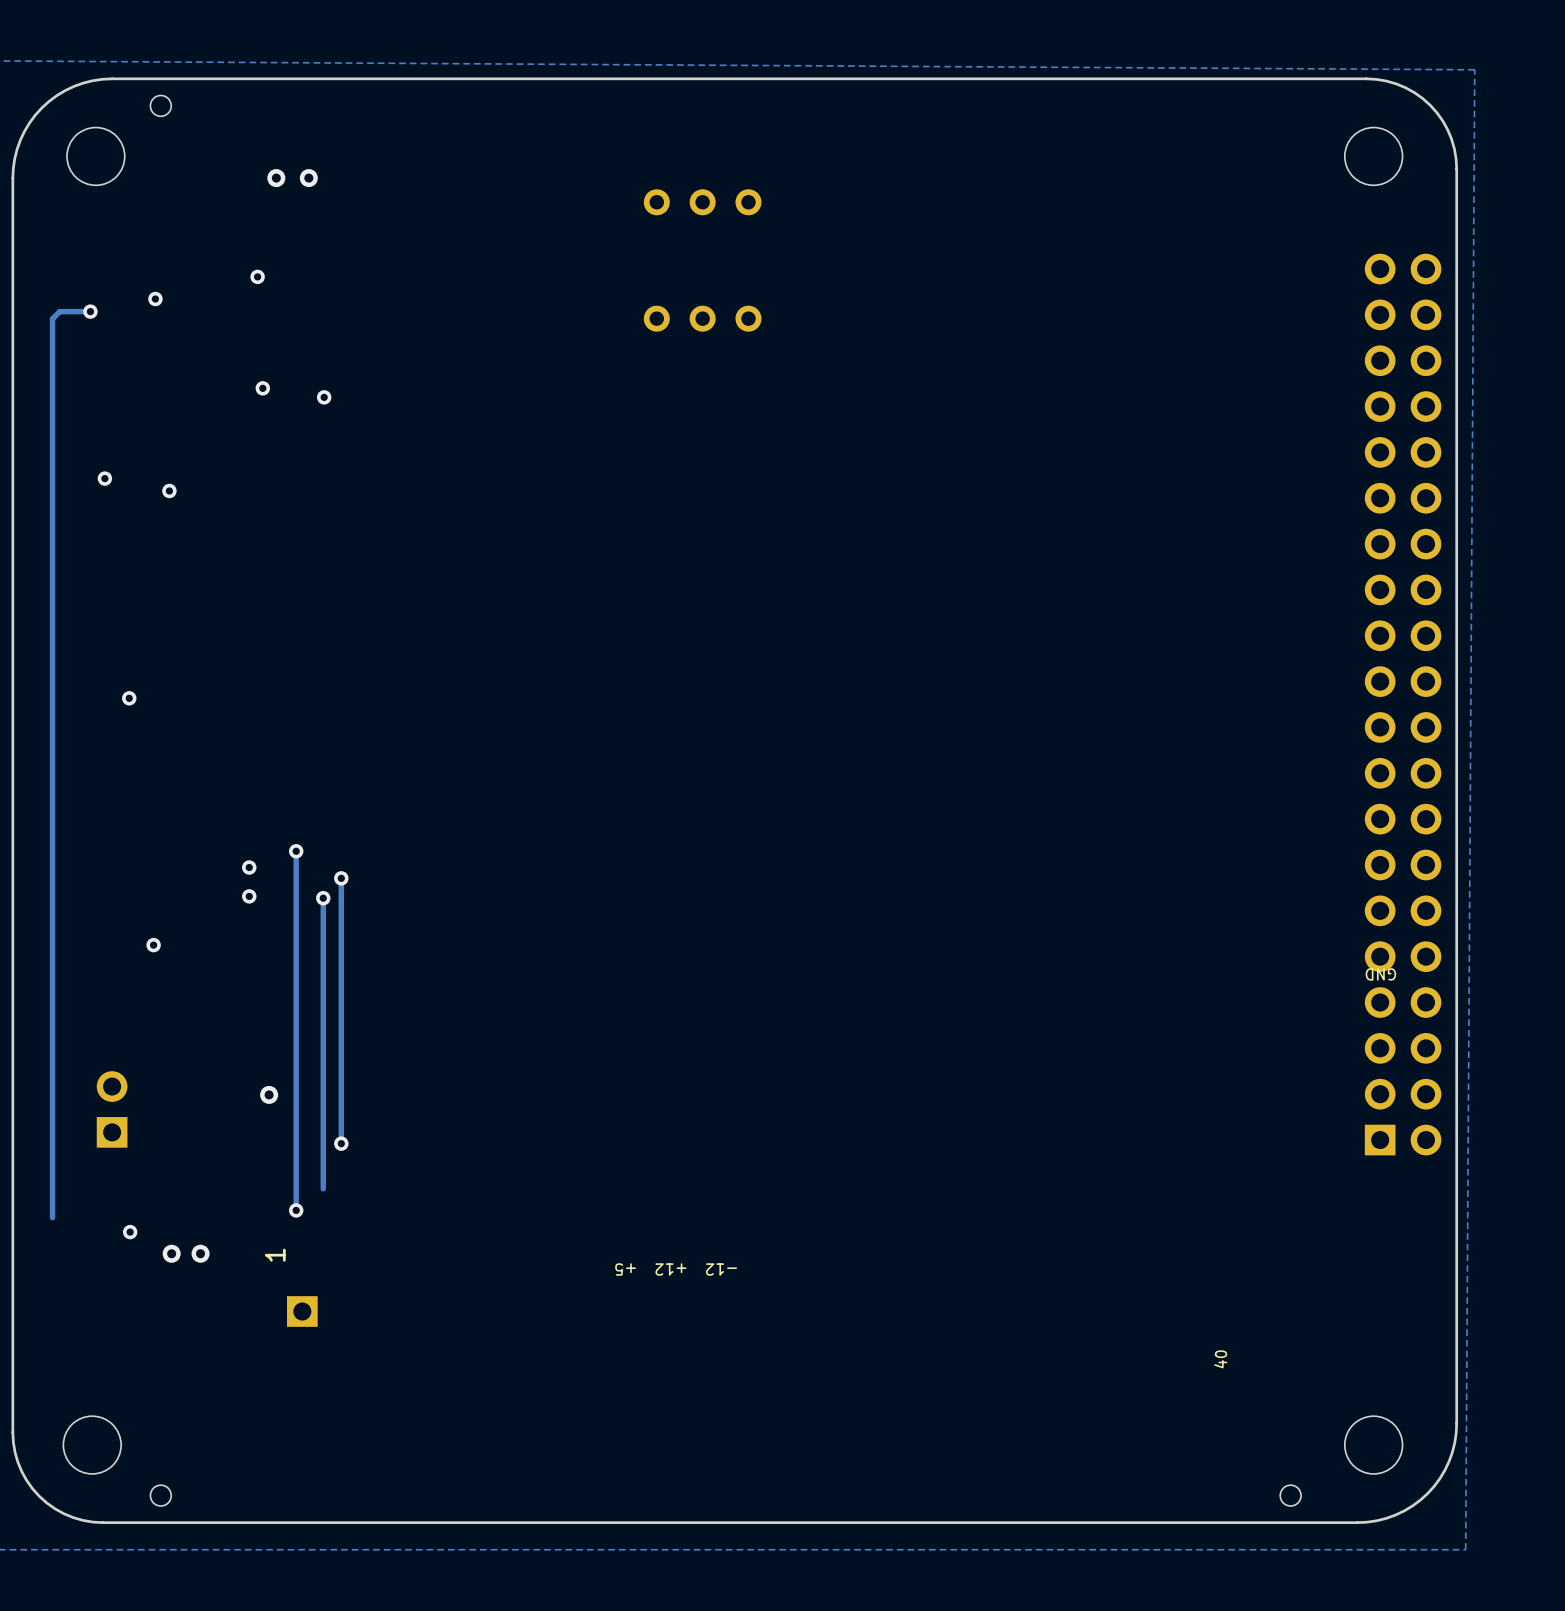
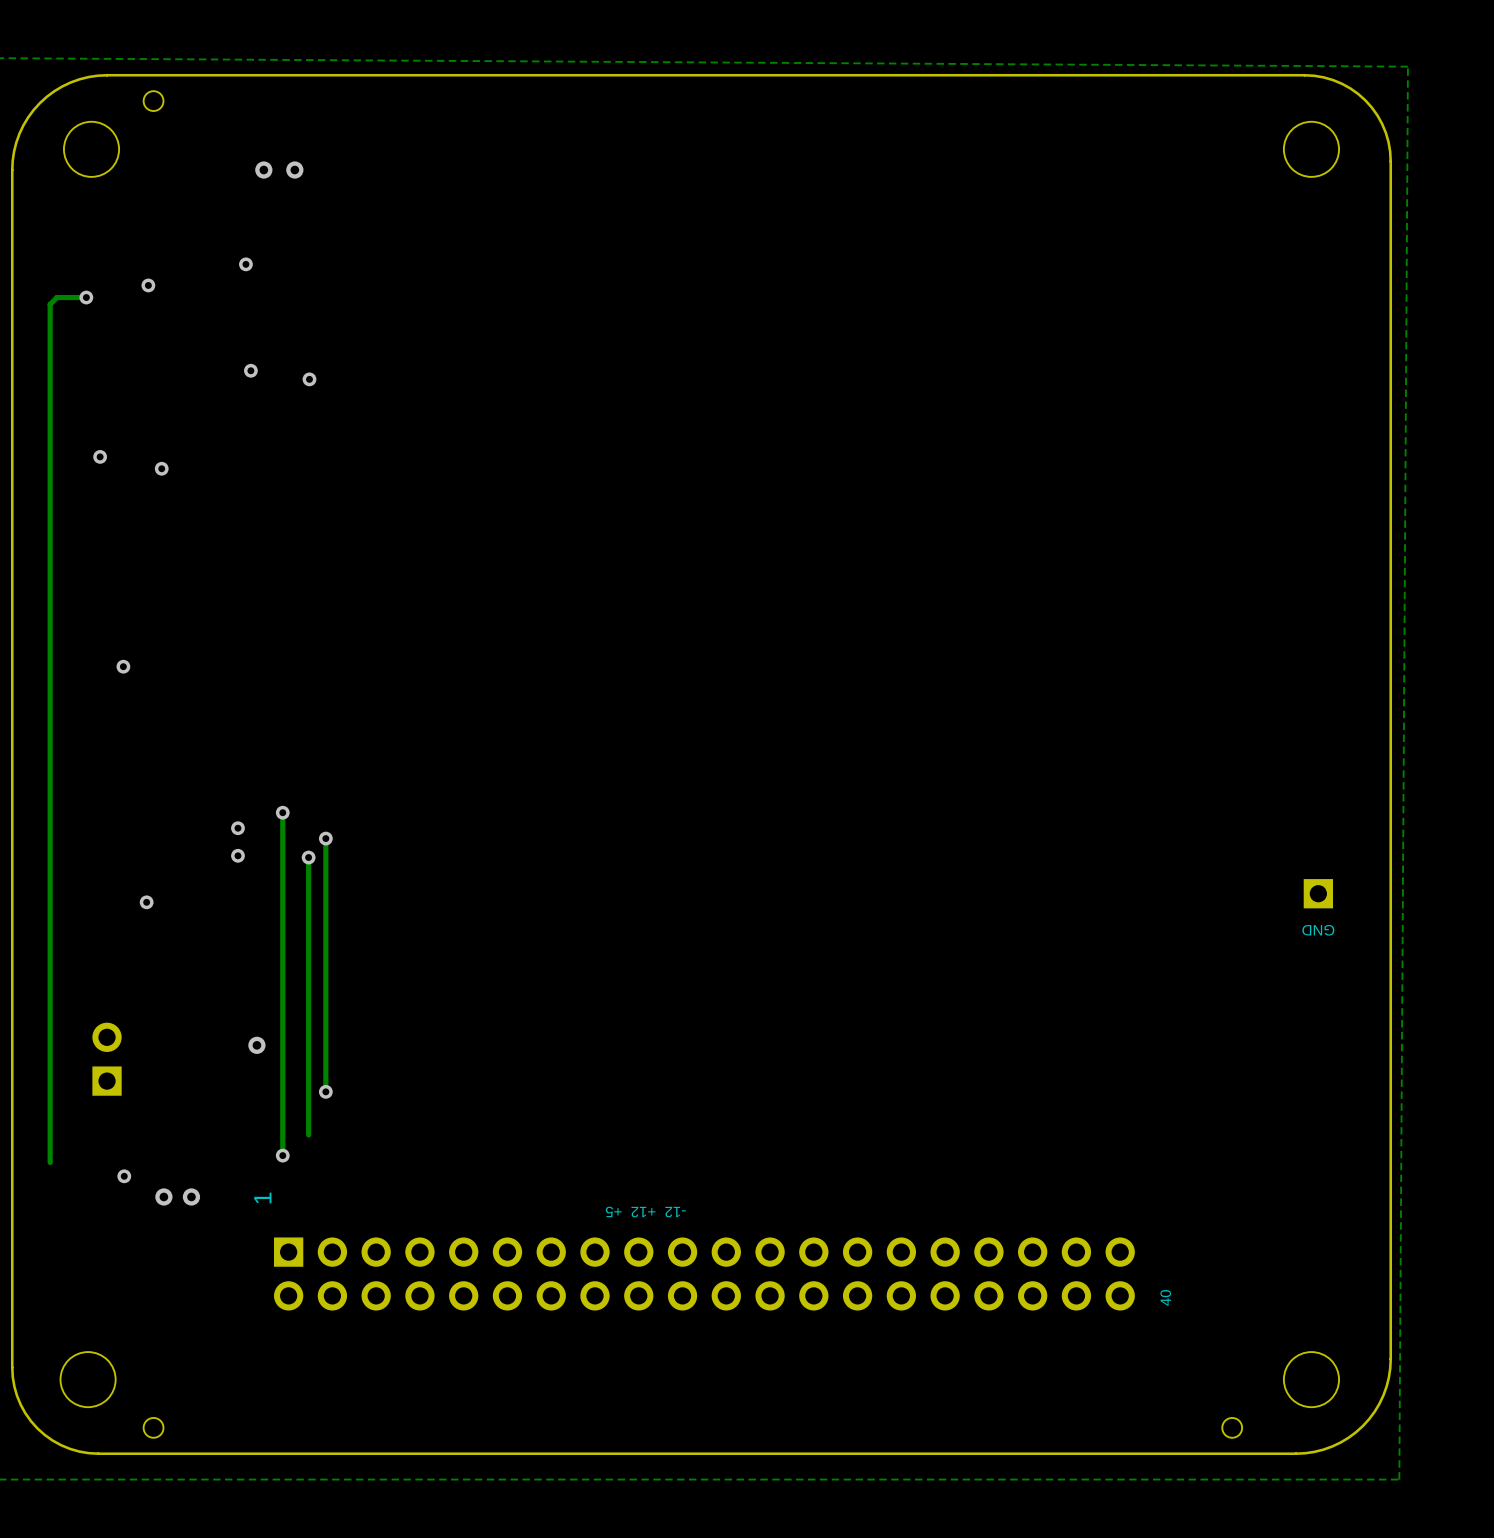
part: (702, 202) -> none
part: (702, 318) -> none
part: (1403, 704) -> none
part: none -> (1318, 893)
part: none -> (704, 1273)

